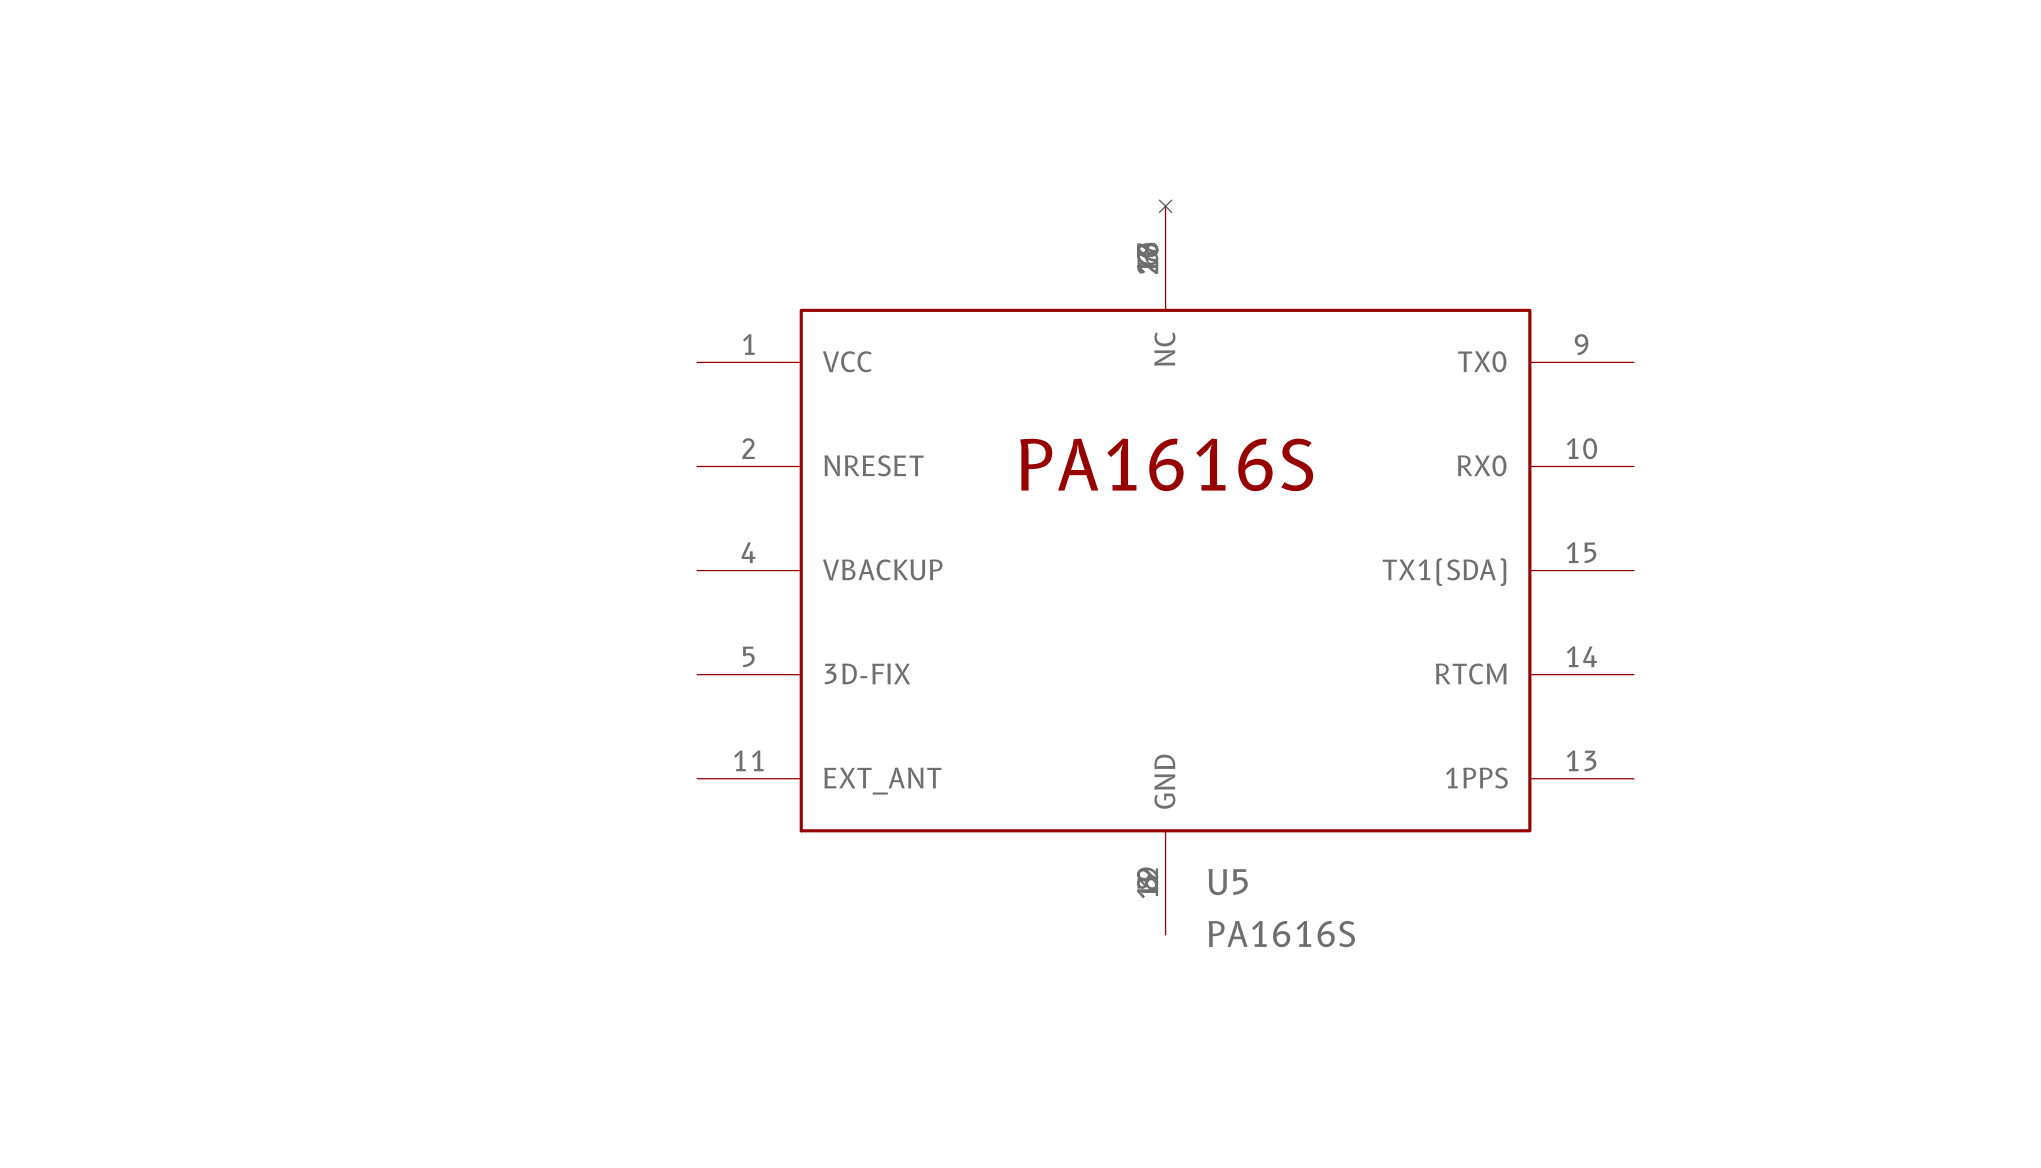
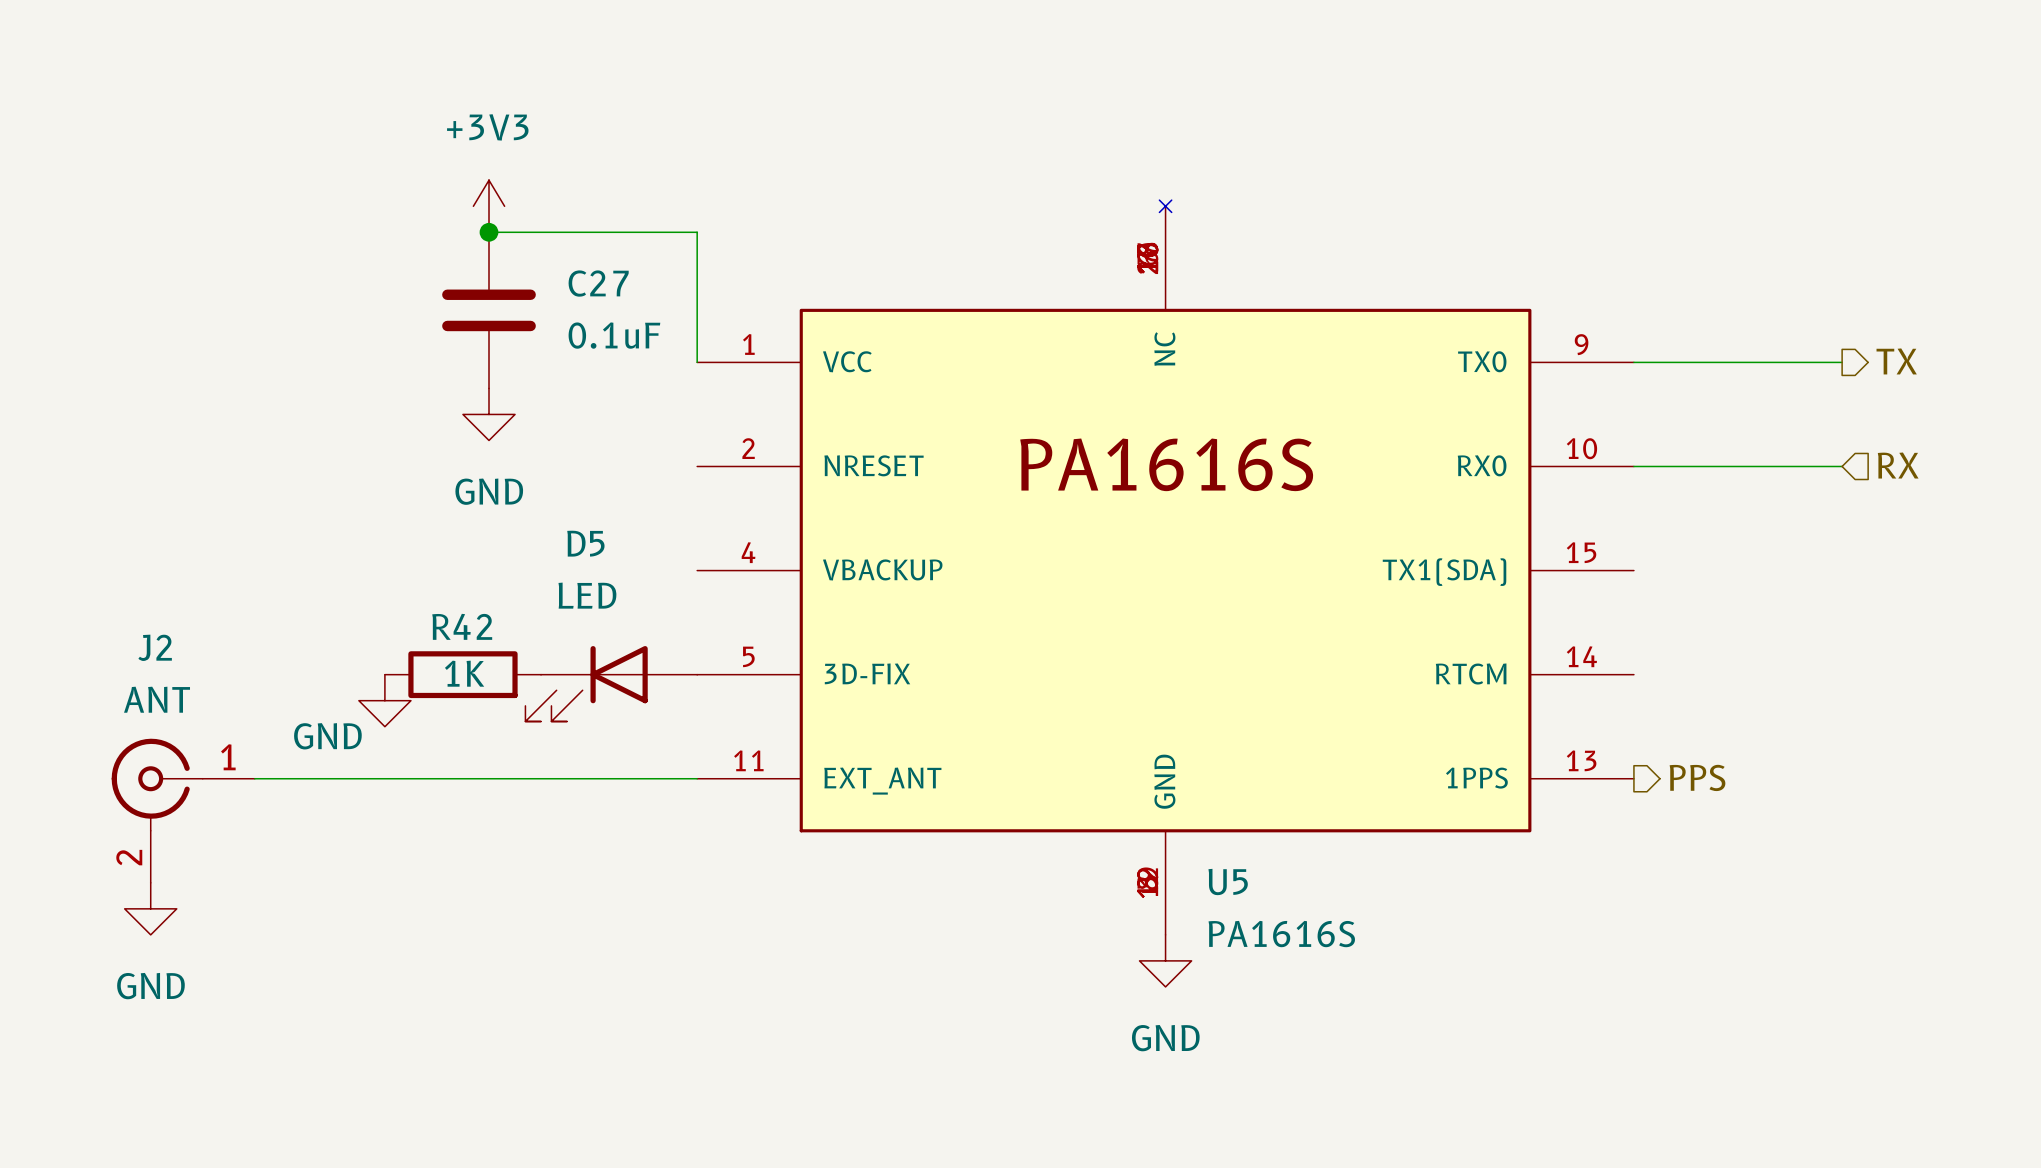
power symbol: none -> +3V3 (489, 206)
wire: none -> (489, 232) (697, 232) (697, 362)
junction: none -> (489, 232)
C27: none -> 0.1uF (489, 310)
hierarchical label: none -> TX (1896, 361)
wire: none -> (1633, 362) (1842, 362)
power symbol: none -> GND (489, 414)
hierarchical label: none -> RX (1898, 465)
wire: none -> (1633, 466) (1842, 466)
R42: none -> 1K (462, 674)
D5: none -> LED (611, 683)
power symbol: none -> GND (384, 700)
hierarchical label: none -> PPS (1697, 777)
wire: none -> (254, 778) (697, 778)
J2: none -> ANT (183, 810)
power symbol: none -> GND (150, 908)
power symbol: none -> GND (1165, 960)

